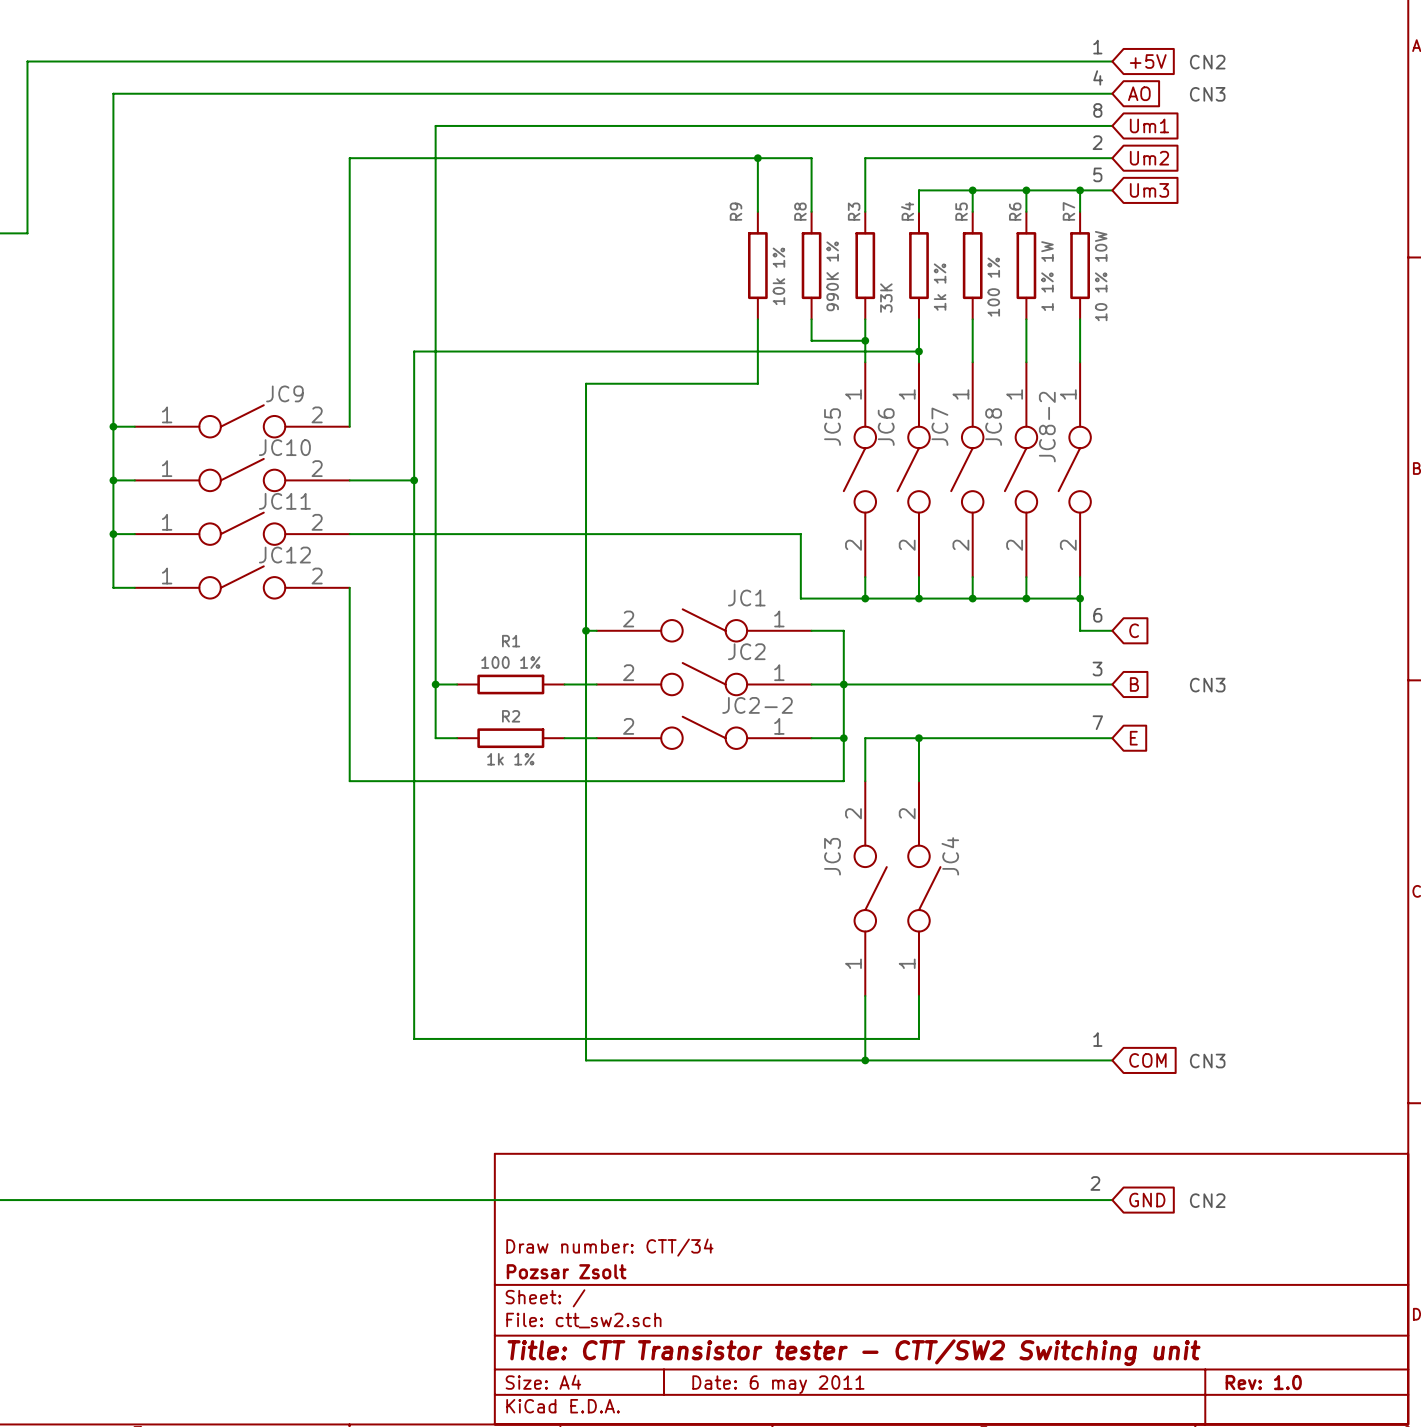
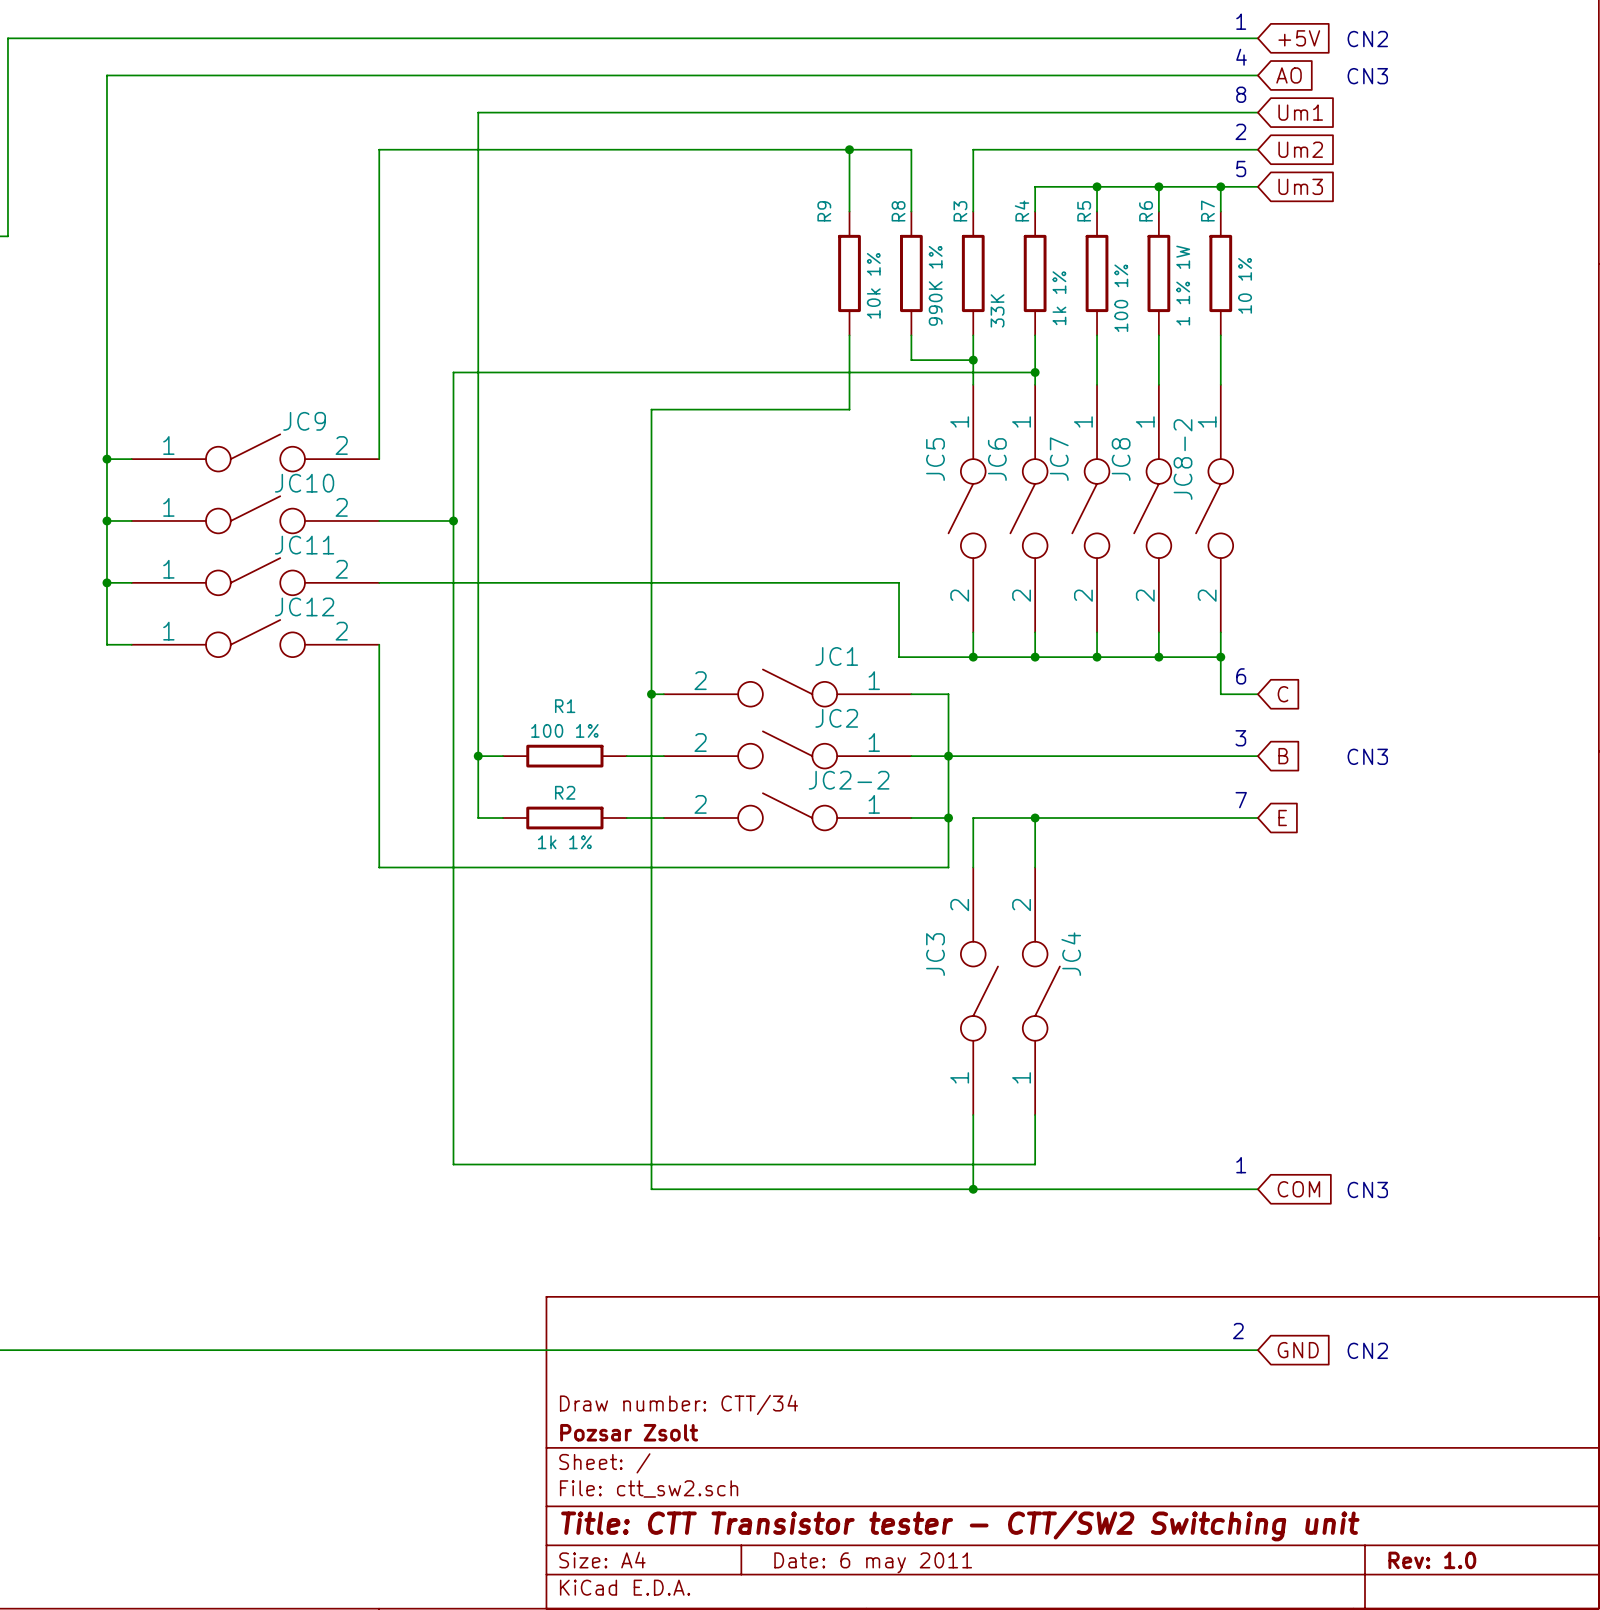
R7 value: 10 1% 10W (1101, 276) -> 10 1% (1245, 285)

